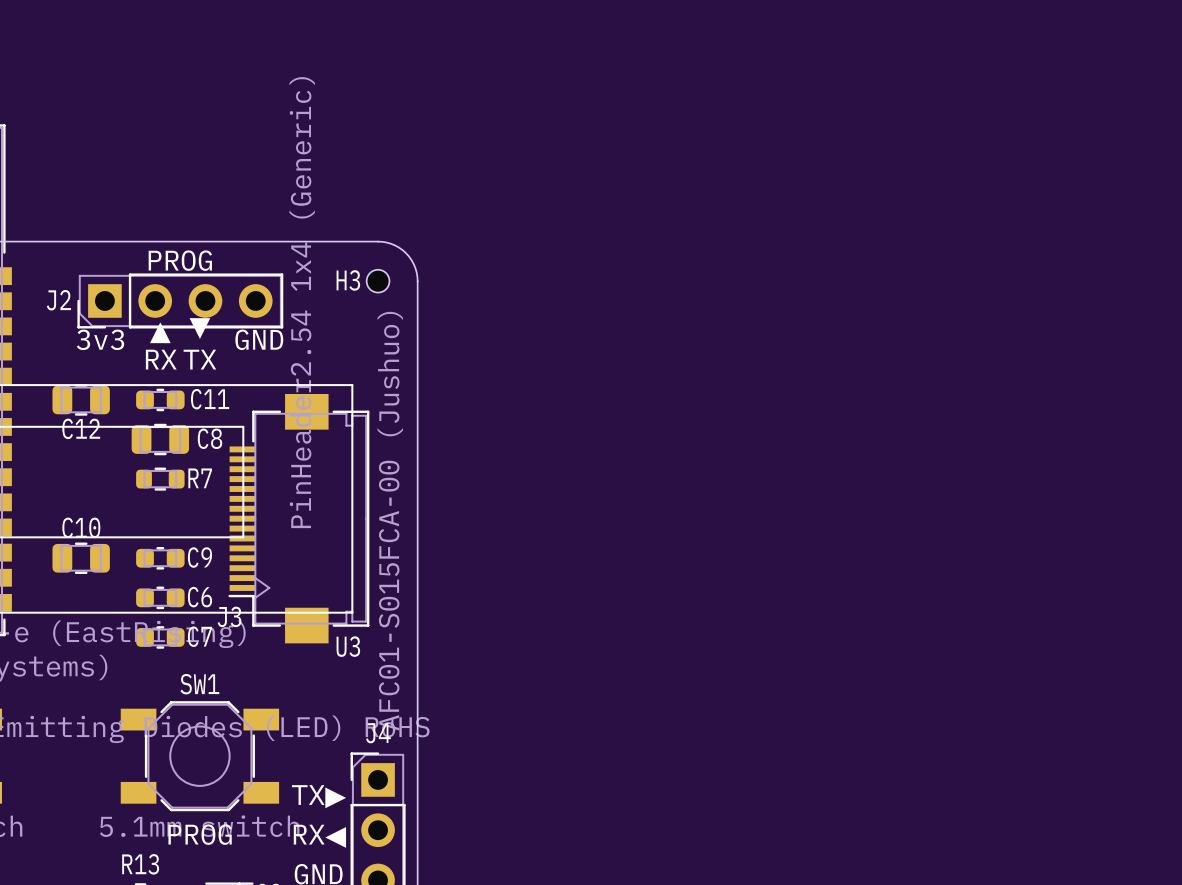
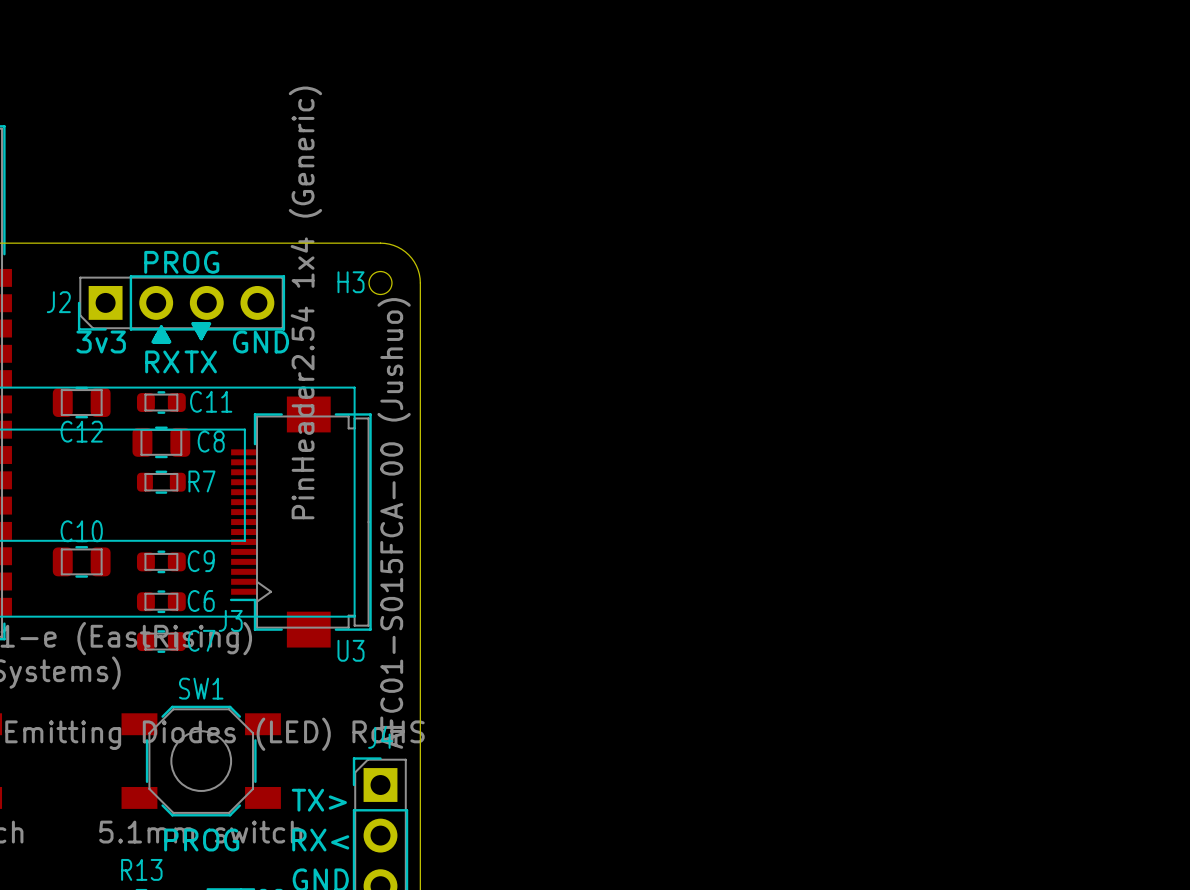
text: TX▶ (318, 796) -> TX> (319, 800)
text: RX◀ (319, 836) -> RX< (320, 840)

